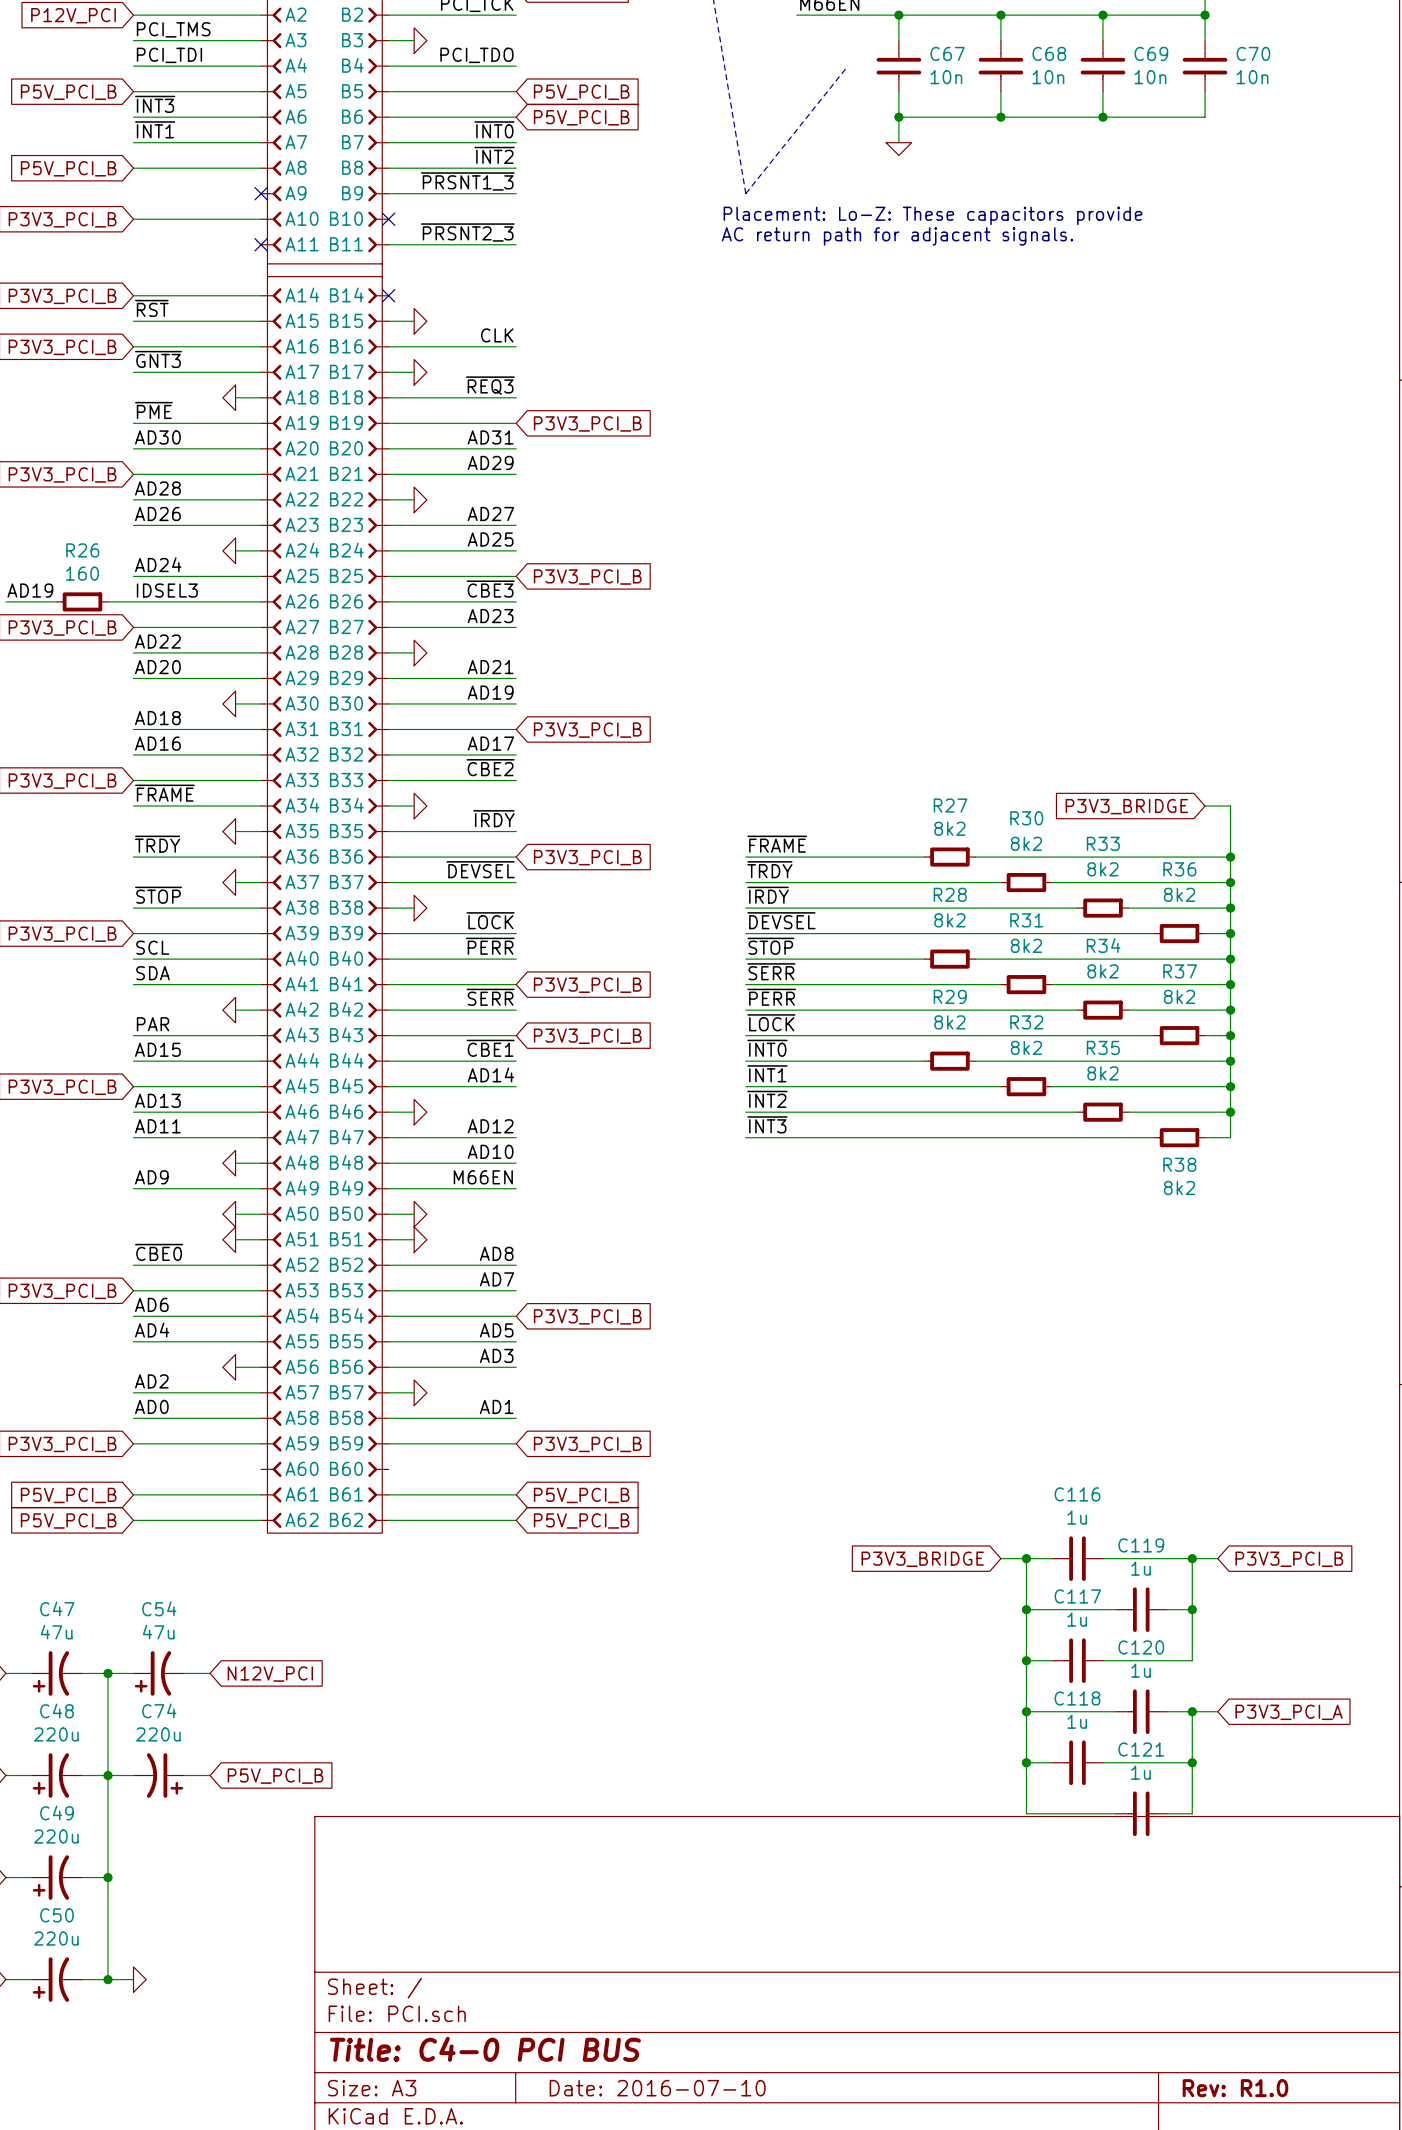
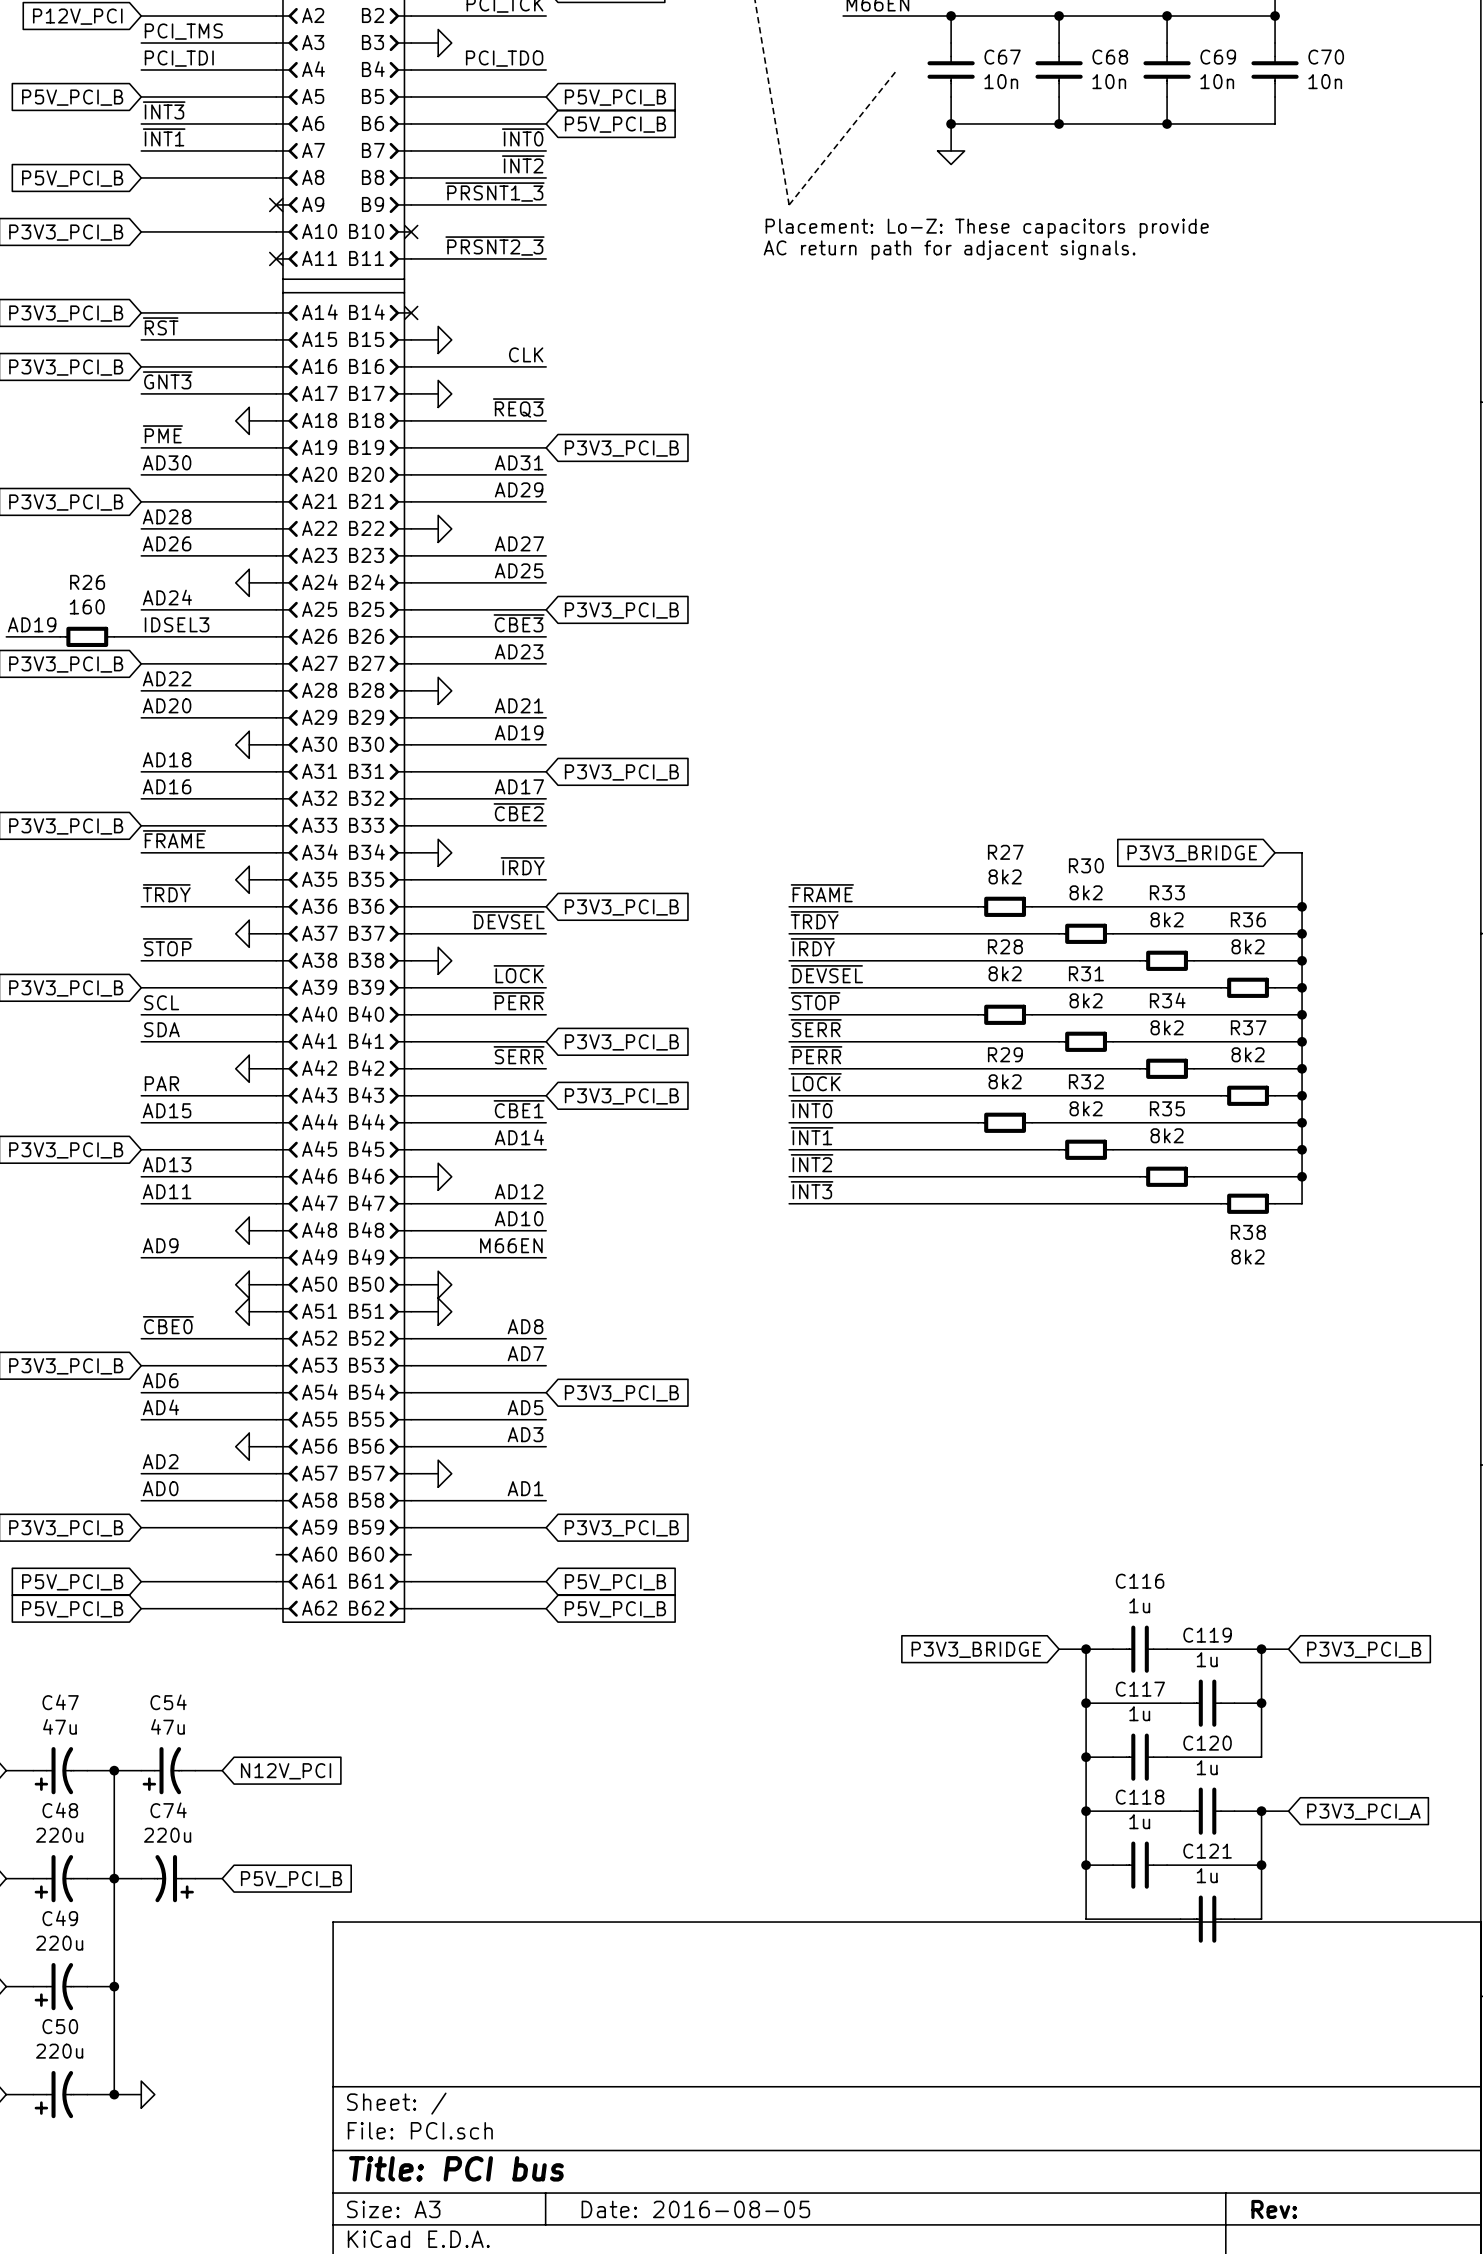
title block: Title: C4-0 PCI BUS (485, 2049) -> Title: PCI bus (456, 2168)
title block: Date: 2016-07-10 (657, 2088) -> Date: 2016-08-05 (695, 2209)
title block: Rev: R1.0 (1235, 2088) -> Rev: (1274, 2209)

